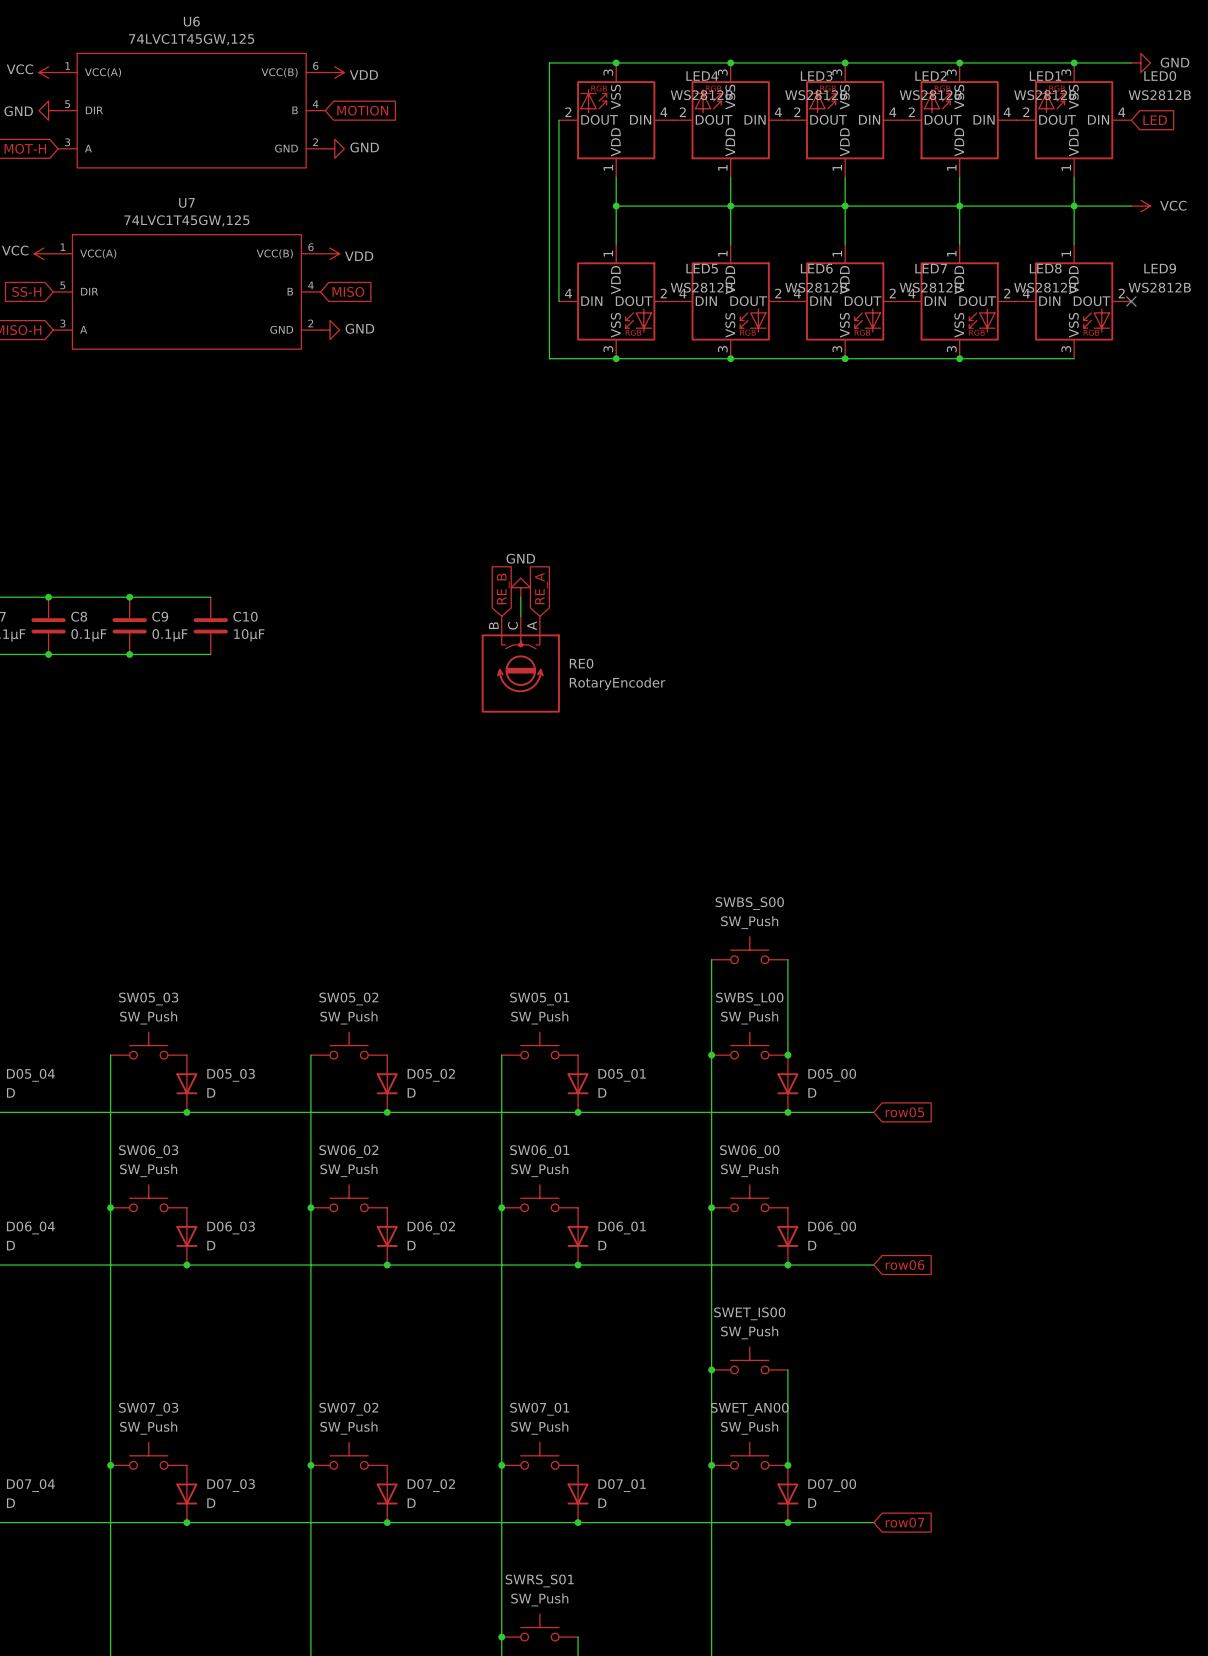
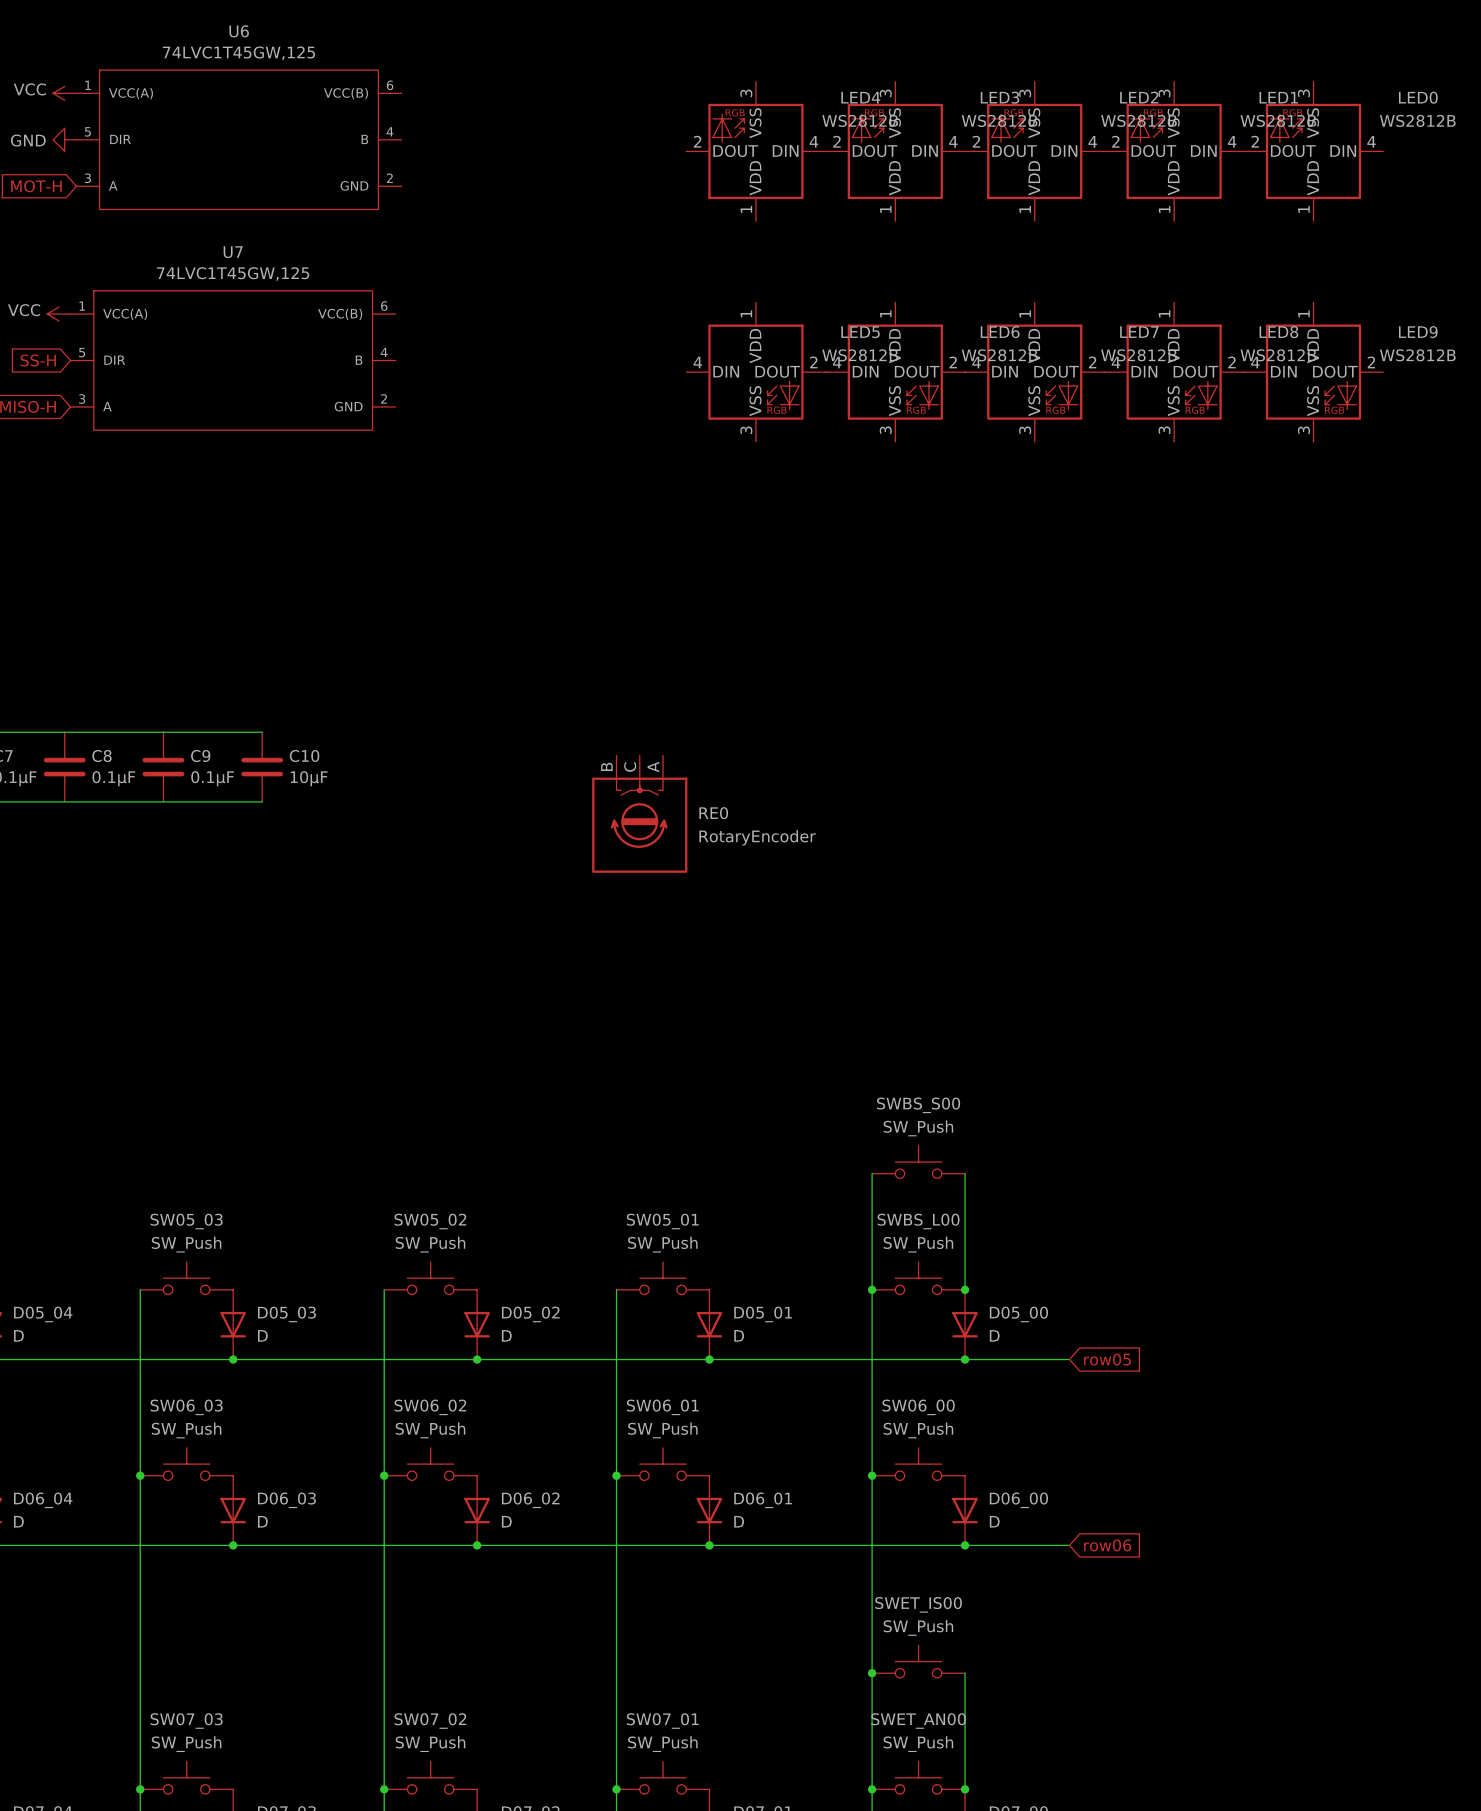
junction: (616, 62) -> none
junction: (730, 62) -> none
junction: (845, 62) -> none
junction: (959, 62) -> none
junction: (1074, 62) -> none
wire: (1131, 62) (549, 62) (549, 358) (1074, 358) -> none
power symbol: GND (1140, 62) -> none
power symbol: VDD (334, 72) -> none
global label: MOTION (362, 110) -> none
wire: (558, 120) (558, 301) -> none
global label: LED (1155, 120) -> none
power symbol: GND (334, 148) -> none
wire: (616, 177) (616, 244) -> none
wire: (730, 177) (730, 244) -> none
wire: (845, 177) (845, 244) -> none
wire: (959, 177) (959, 244) -> none
wire: (1074, 177) (1074, 244) -> none
wire: (616, 206) (1131, 206) -> none
junction: (616, 206) -> none
junction: (730, 206) -> none
junction: (845, 206) -> none
junction: (959, 206) -> none
junction: (1074, 206) -> none
power symbol: VCC (1140, 206) -> none
power symbol: VDD (330, 253) -> none
global label: MISO (348, 291) -> none
no-connect mark: (1131, 301) -> none
power symbol: GND (330, 330) -> none
junction: (616, 358) -> none
junction: (730, 358) -> none
junction: (845, 358) -> none
junction: (959, 358) -> none
power symbol: GND (520, 587) -> none
global label: RE_B (503, 588) -> none
global label: RE_A (541, 588) -> none
junction: (48, 597) -> none
junction: (129, 597) -> none
wire: (520, 597) (520, 616) -> none
junction: (48, 654) -> none
junction: (129, 654) -> none

